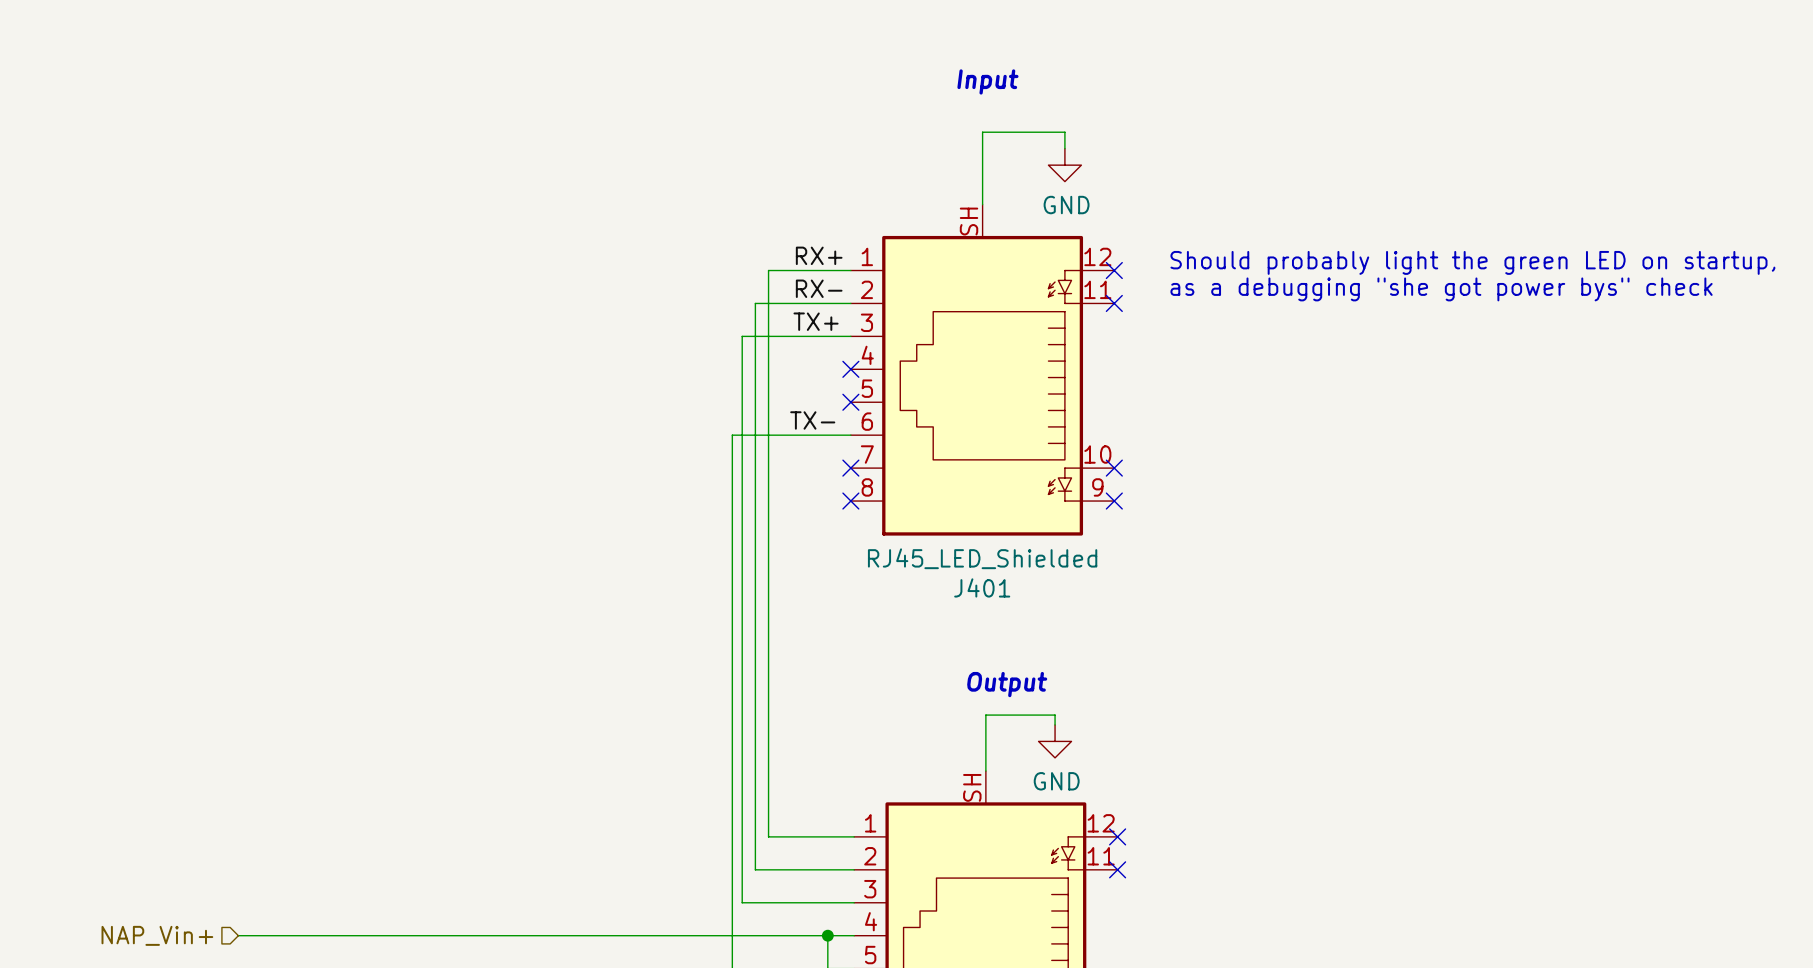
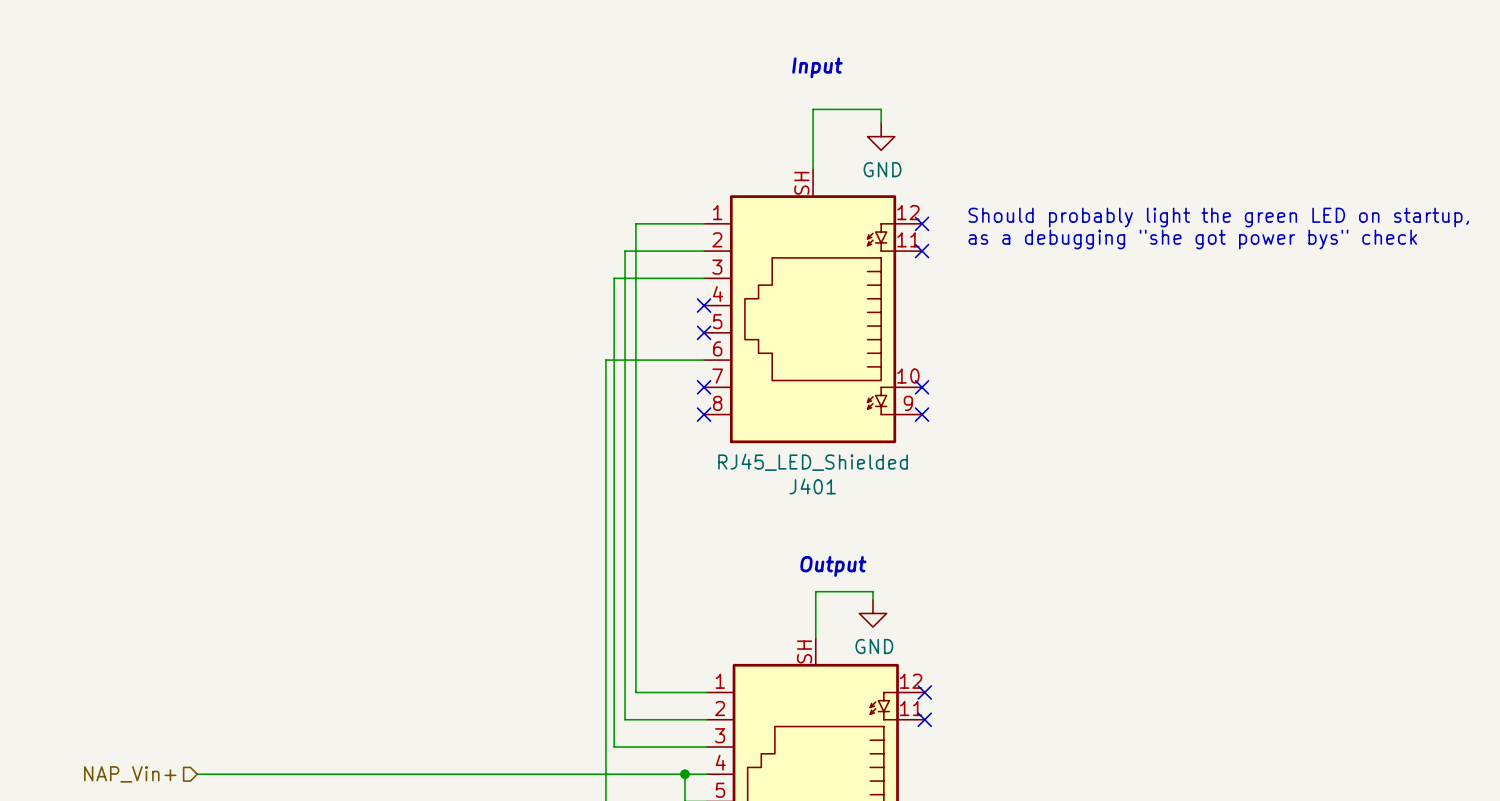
label: RX+ (819, 255) -> none
label: RX- (819, 288) -> none
label: TX+ (816, 321) -> none
label: TX- (812, 420) -> none

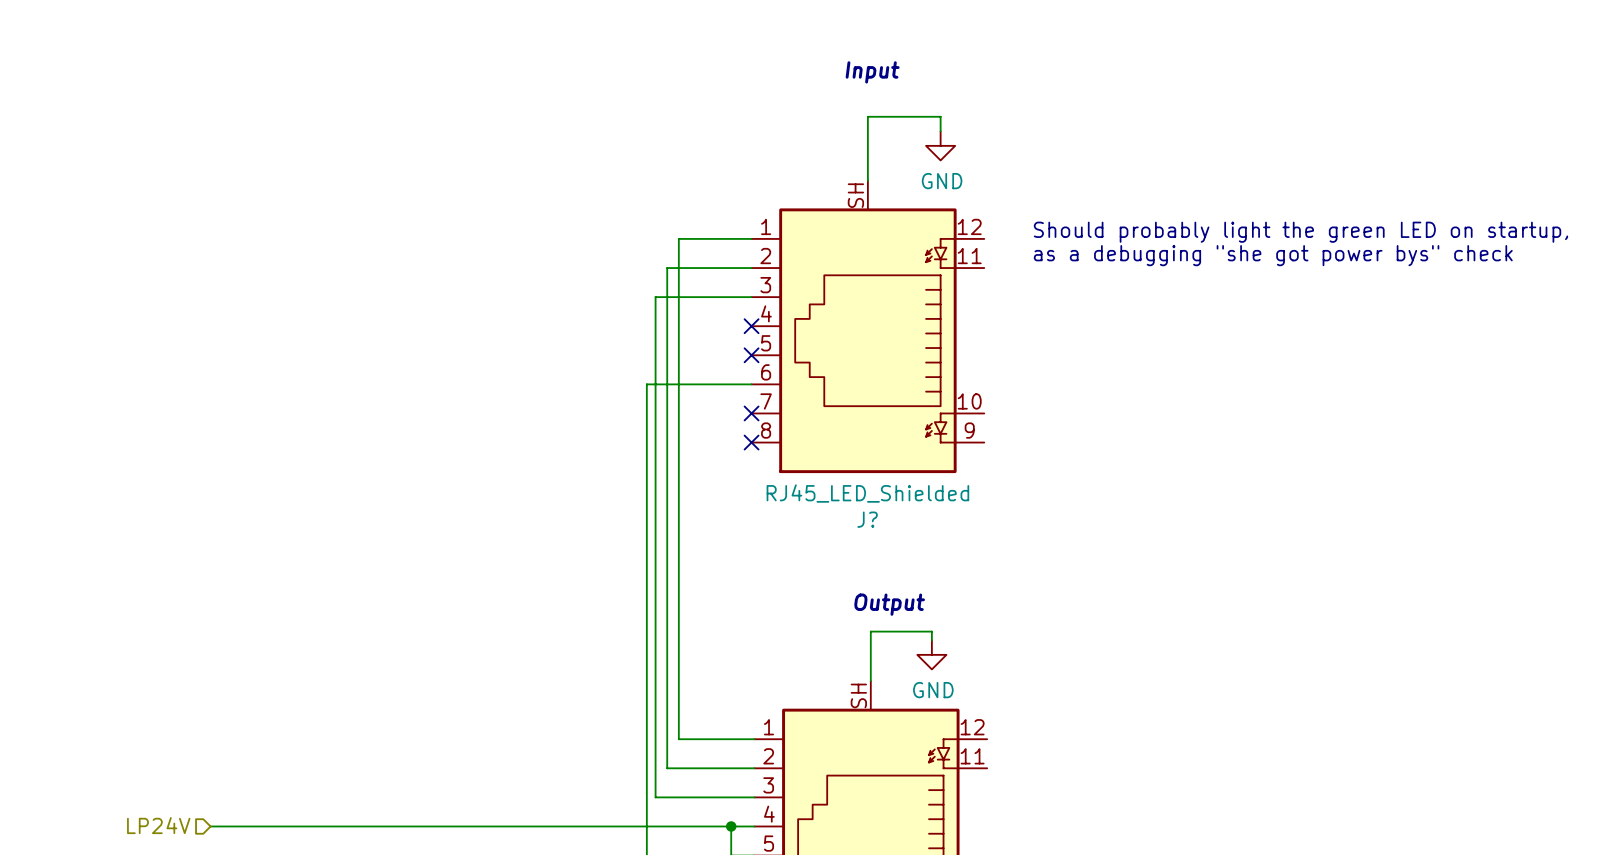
no-connect mark: (922, 223) -> none
no-connect mark: (922, 251) -> none
no-connect mark: (922, 387) -> none
no-connect mark: (922, 414) -> none
J401 name: J401 (812, 486) -> J? (867, 519)
no-connect mark: (924, 692) -> none
no-connect mark: (924, 719) -> none
hierarchical label: NAP_Vin+ (130, 774) -> LP24V (158, 825)

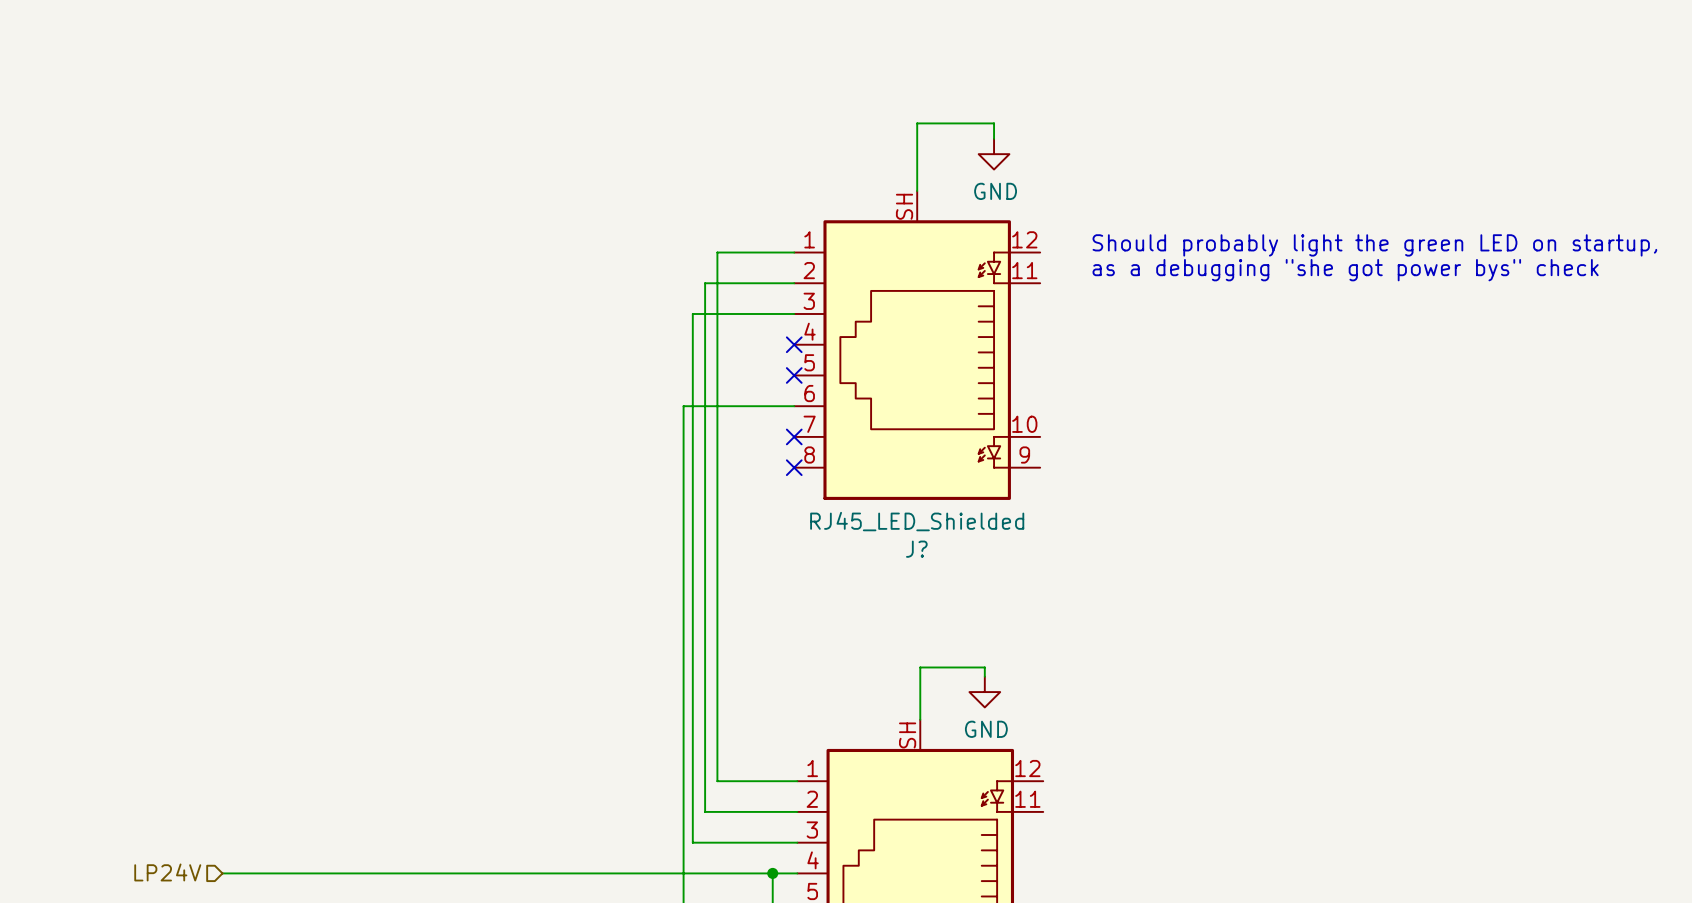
text: Input (872, 72) -> none
text: Output (889, 604) -> none

